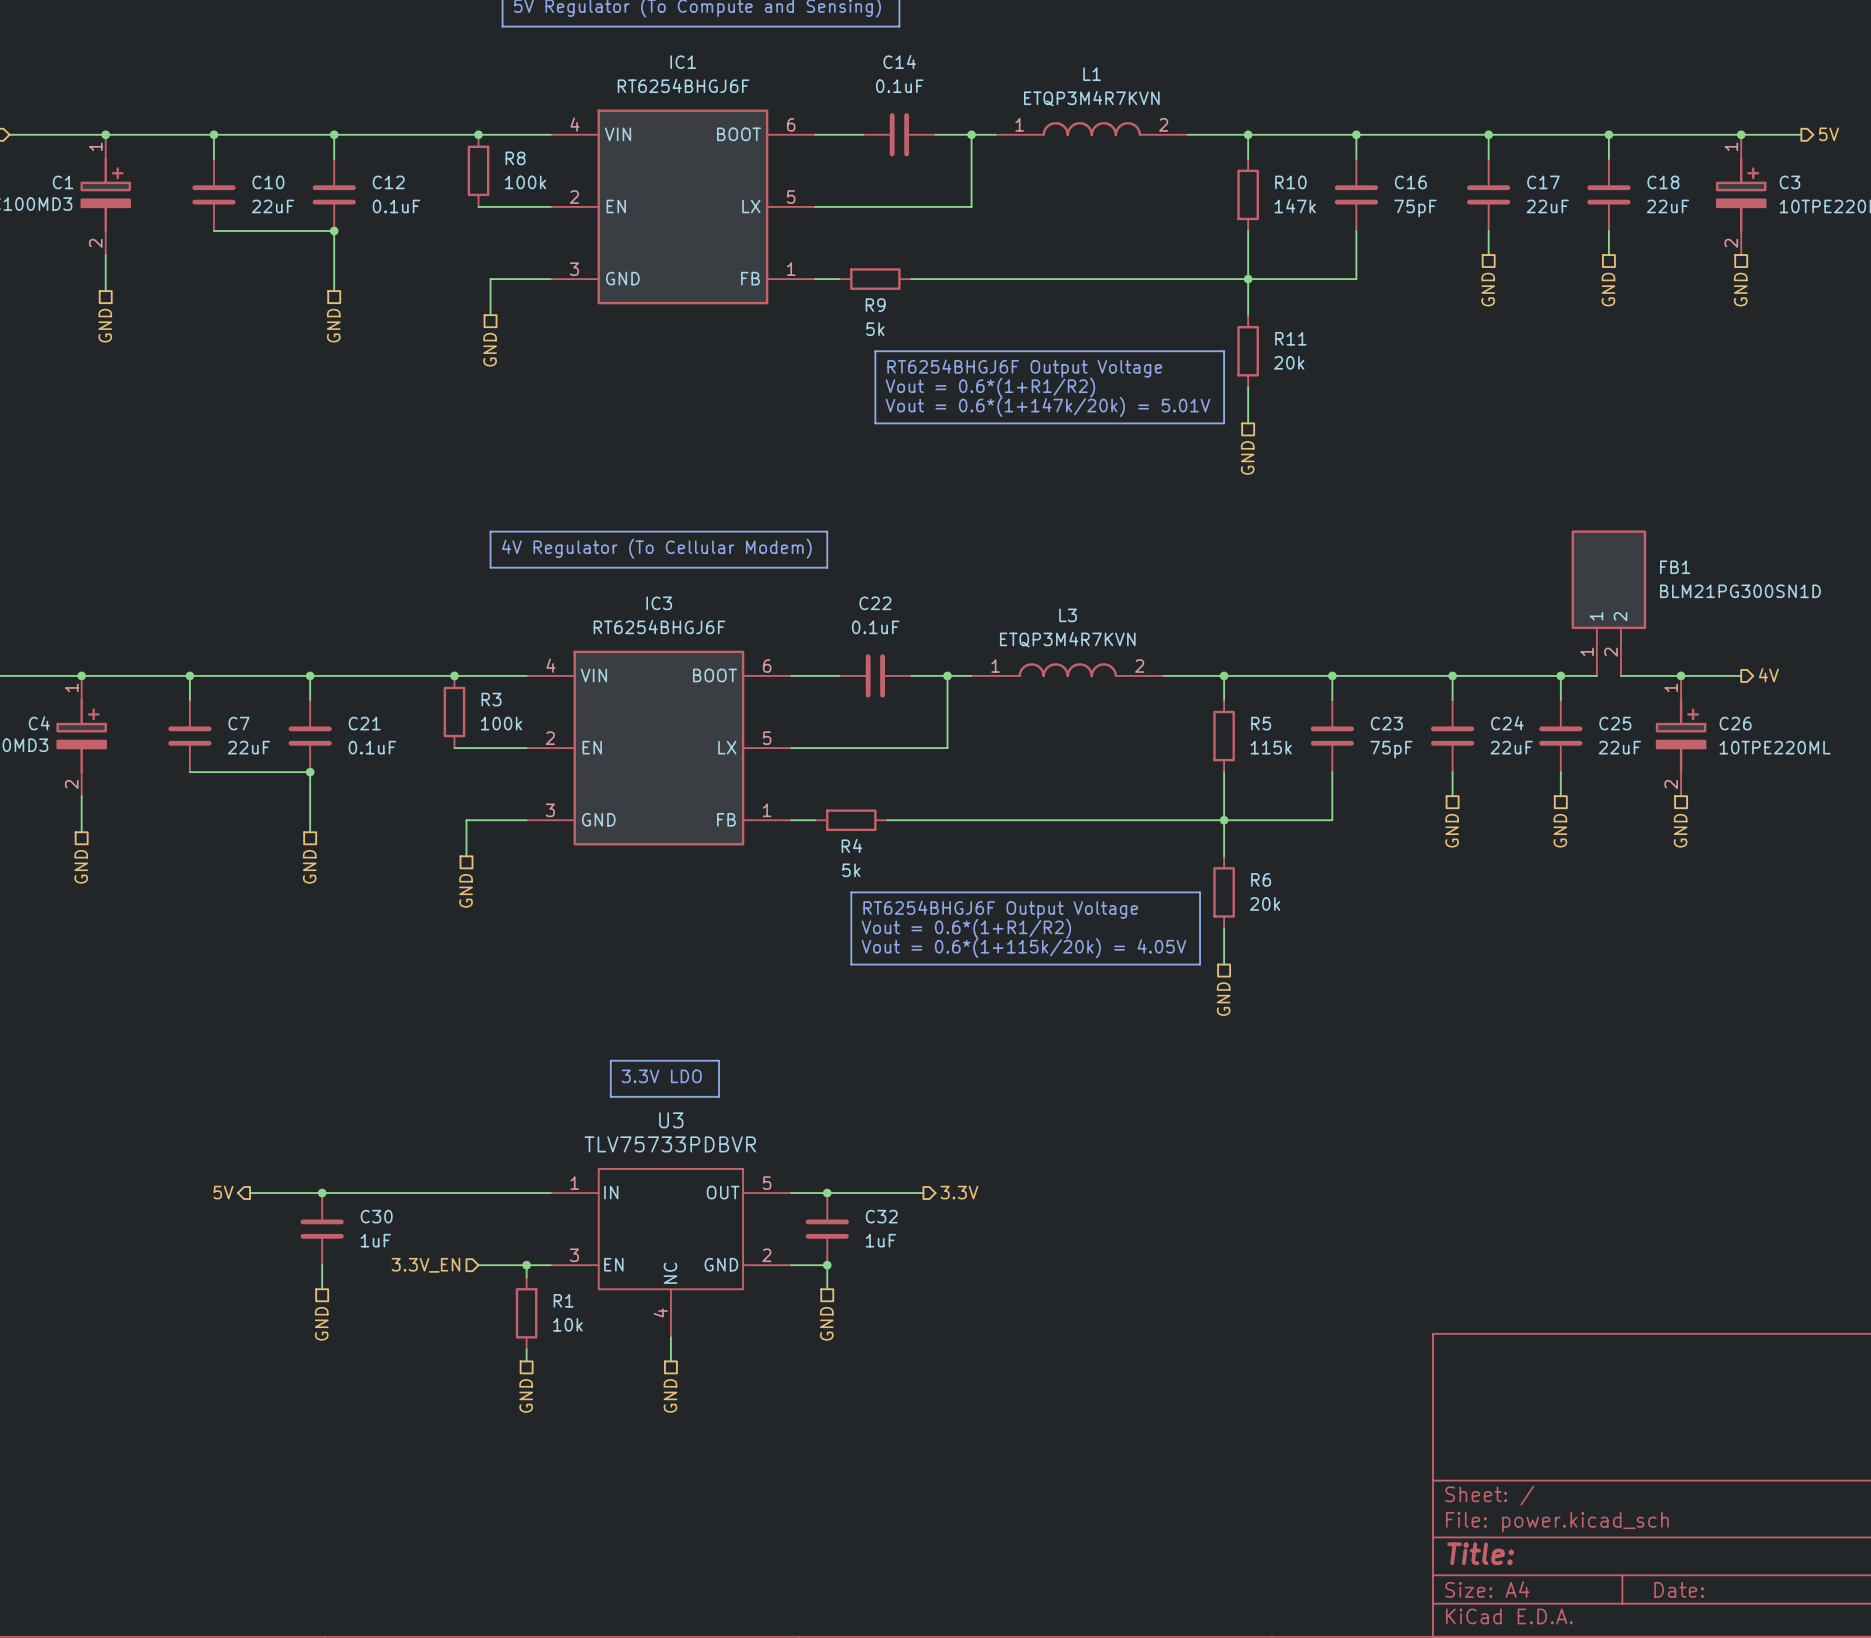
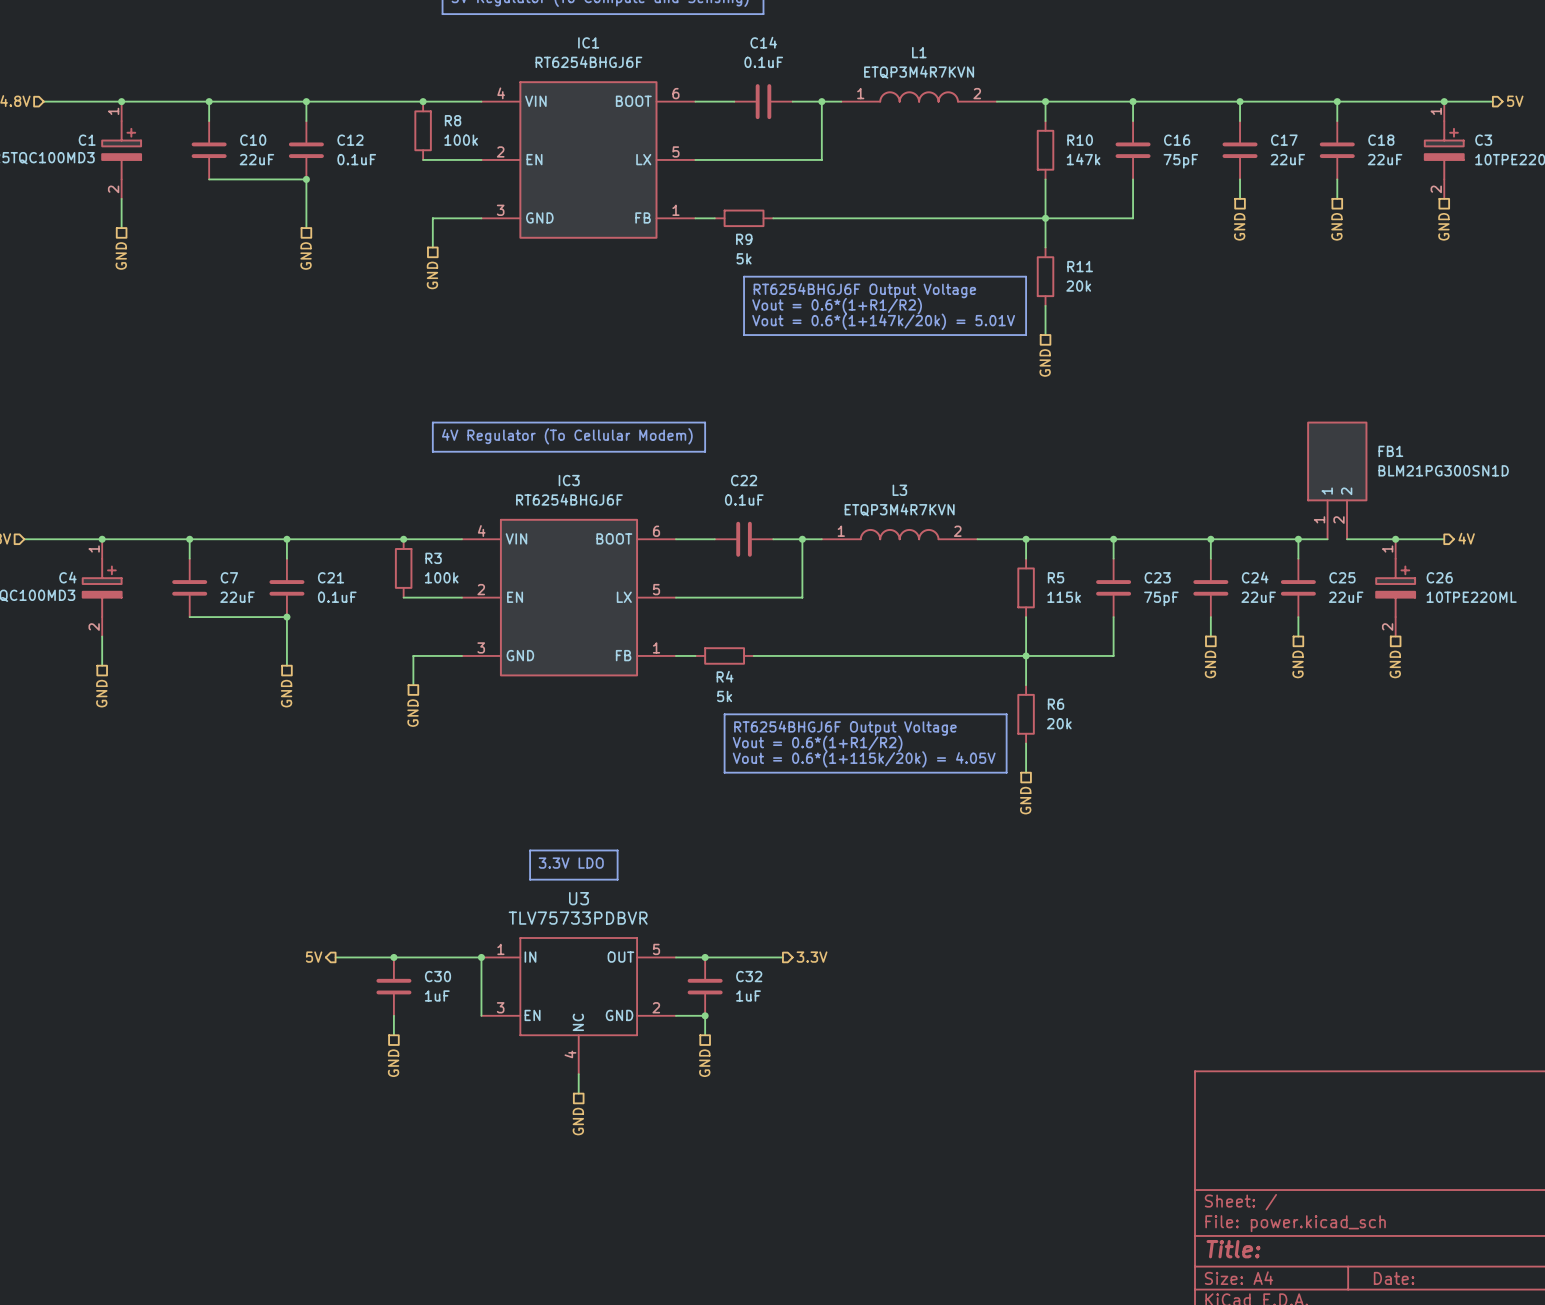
hierarchical label position: 5V (223, 1192) -> 5V (314, 957)
wire: (250, 1193) (370, 1193) -> none
junction: (322, 1193) -> none
junction: none -> (393, 957)
junction: none -> (481, 957)
C30 position: (322, 1229) -> (393, 986)
wire: (322, 1265) (322, 1289) -> (393, 1015) (393, 1035)
hierarchical label: 3.3V_EN (425, 1265) -> none
wire: (478, 1265) (550, 1265) -> (481, 957) (481, 1015)
wire: (526, 1265) (526, 1277) -> none
junction: (526, 1265) -> none
R1: 10k (526, 1313) -> none
hierarchical label: GND (321, 1323) -> none
hierarchical label: none -> GND (393, 1063)
wire: (526, 1349) (526, 1361) -> none
hierarchical label: GND (526, 1395) -> none

